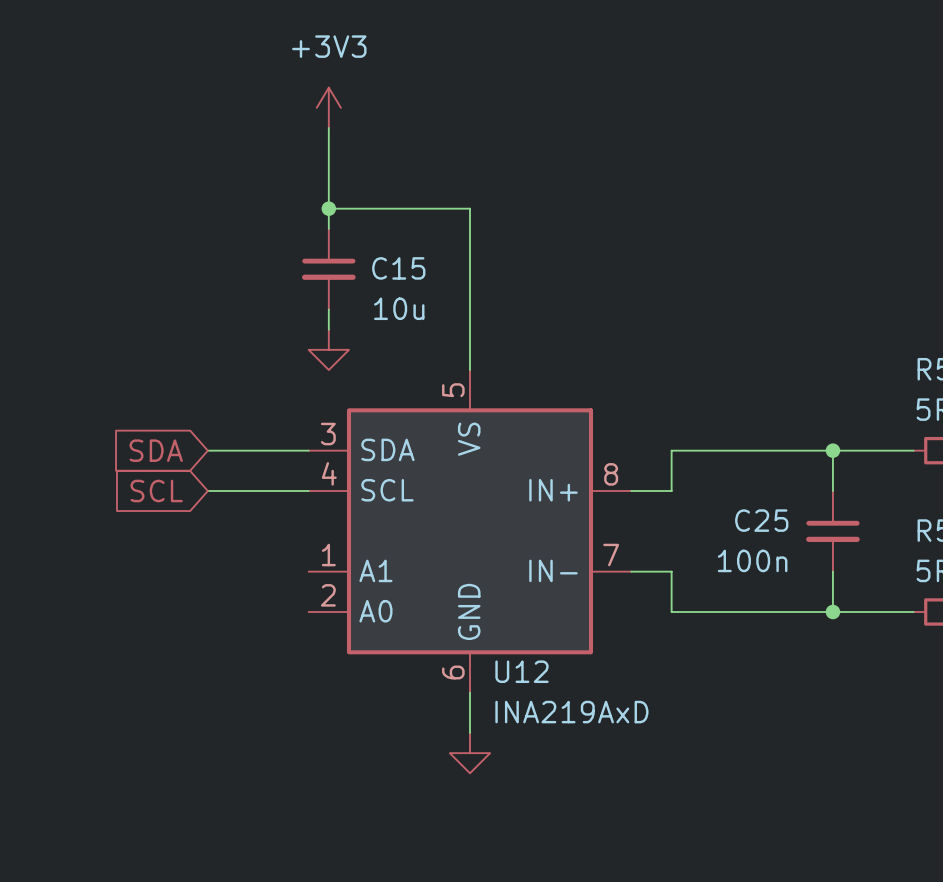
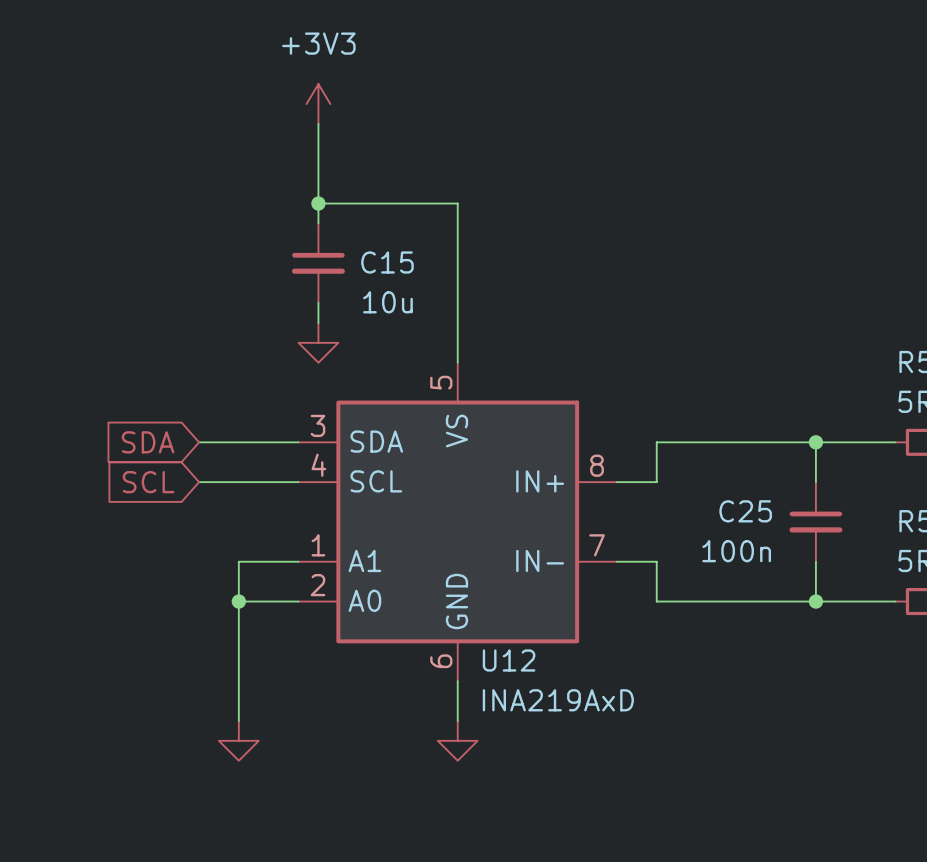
wire: none -> (298, 561) (238, 561) (238, 720)
wire: none -> (238, 601) (298, 601)
junction: none -> (238, 601)
power symbol: none -> (238, 740)

